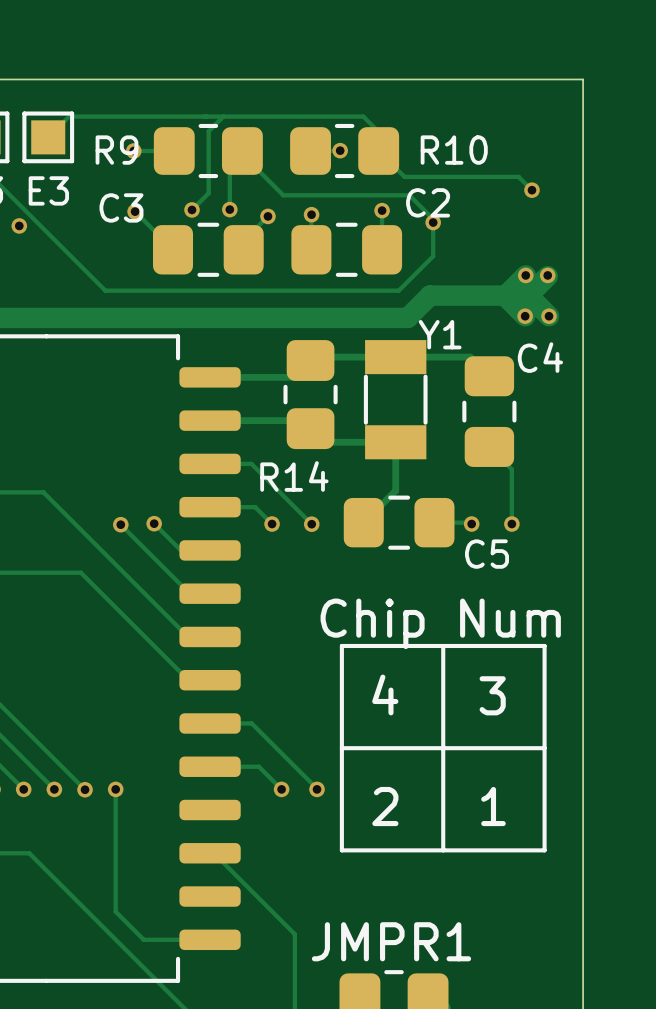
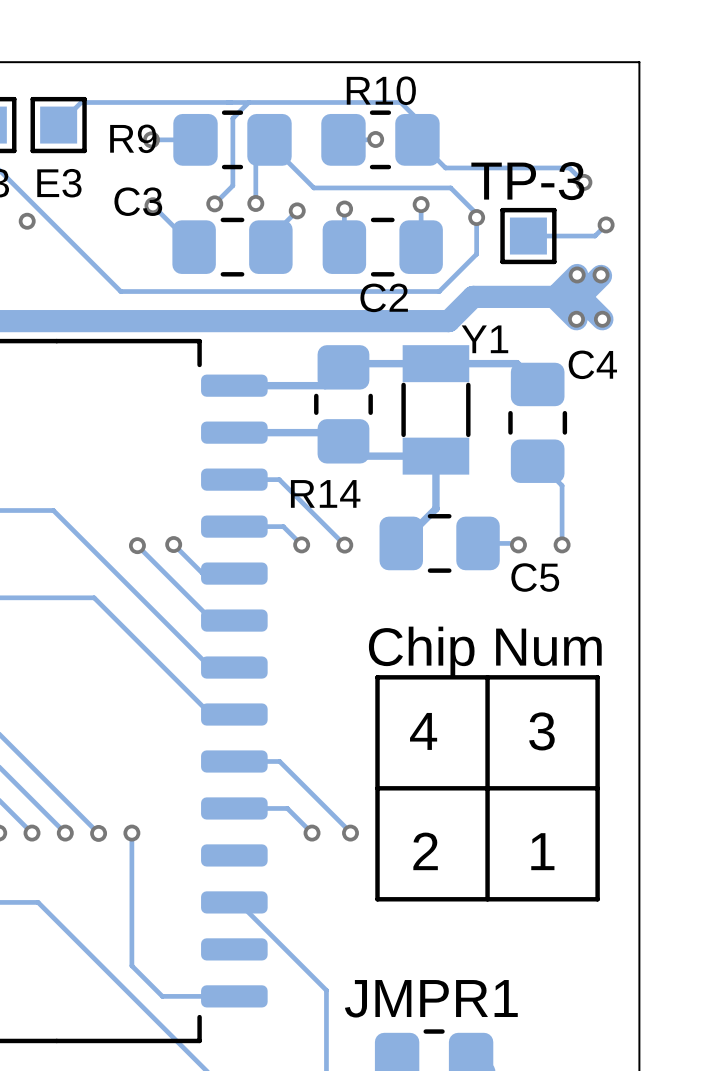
R10 name position: R10 (454, 150) -> R10 (381, 90)
C2 name position: C2 (428, 202) -> C2 (384, 297)
track: none -> (606, 224) (595, 236) (528, 236)
via: none -> (606, 224)
TP-3: none -> (528, 236)

